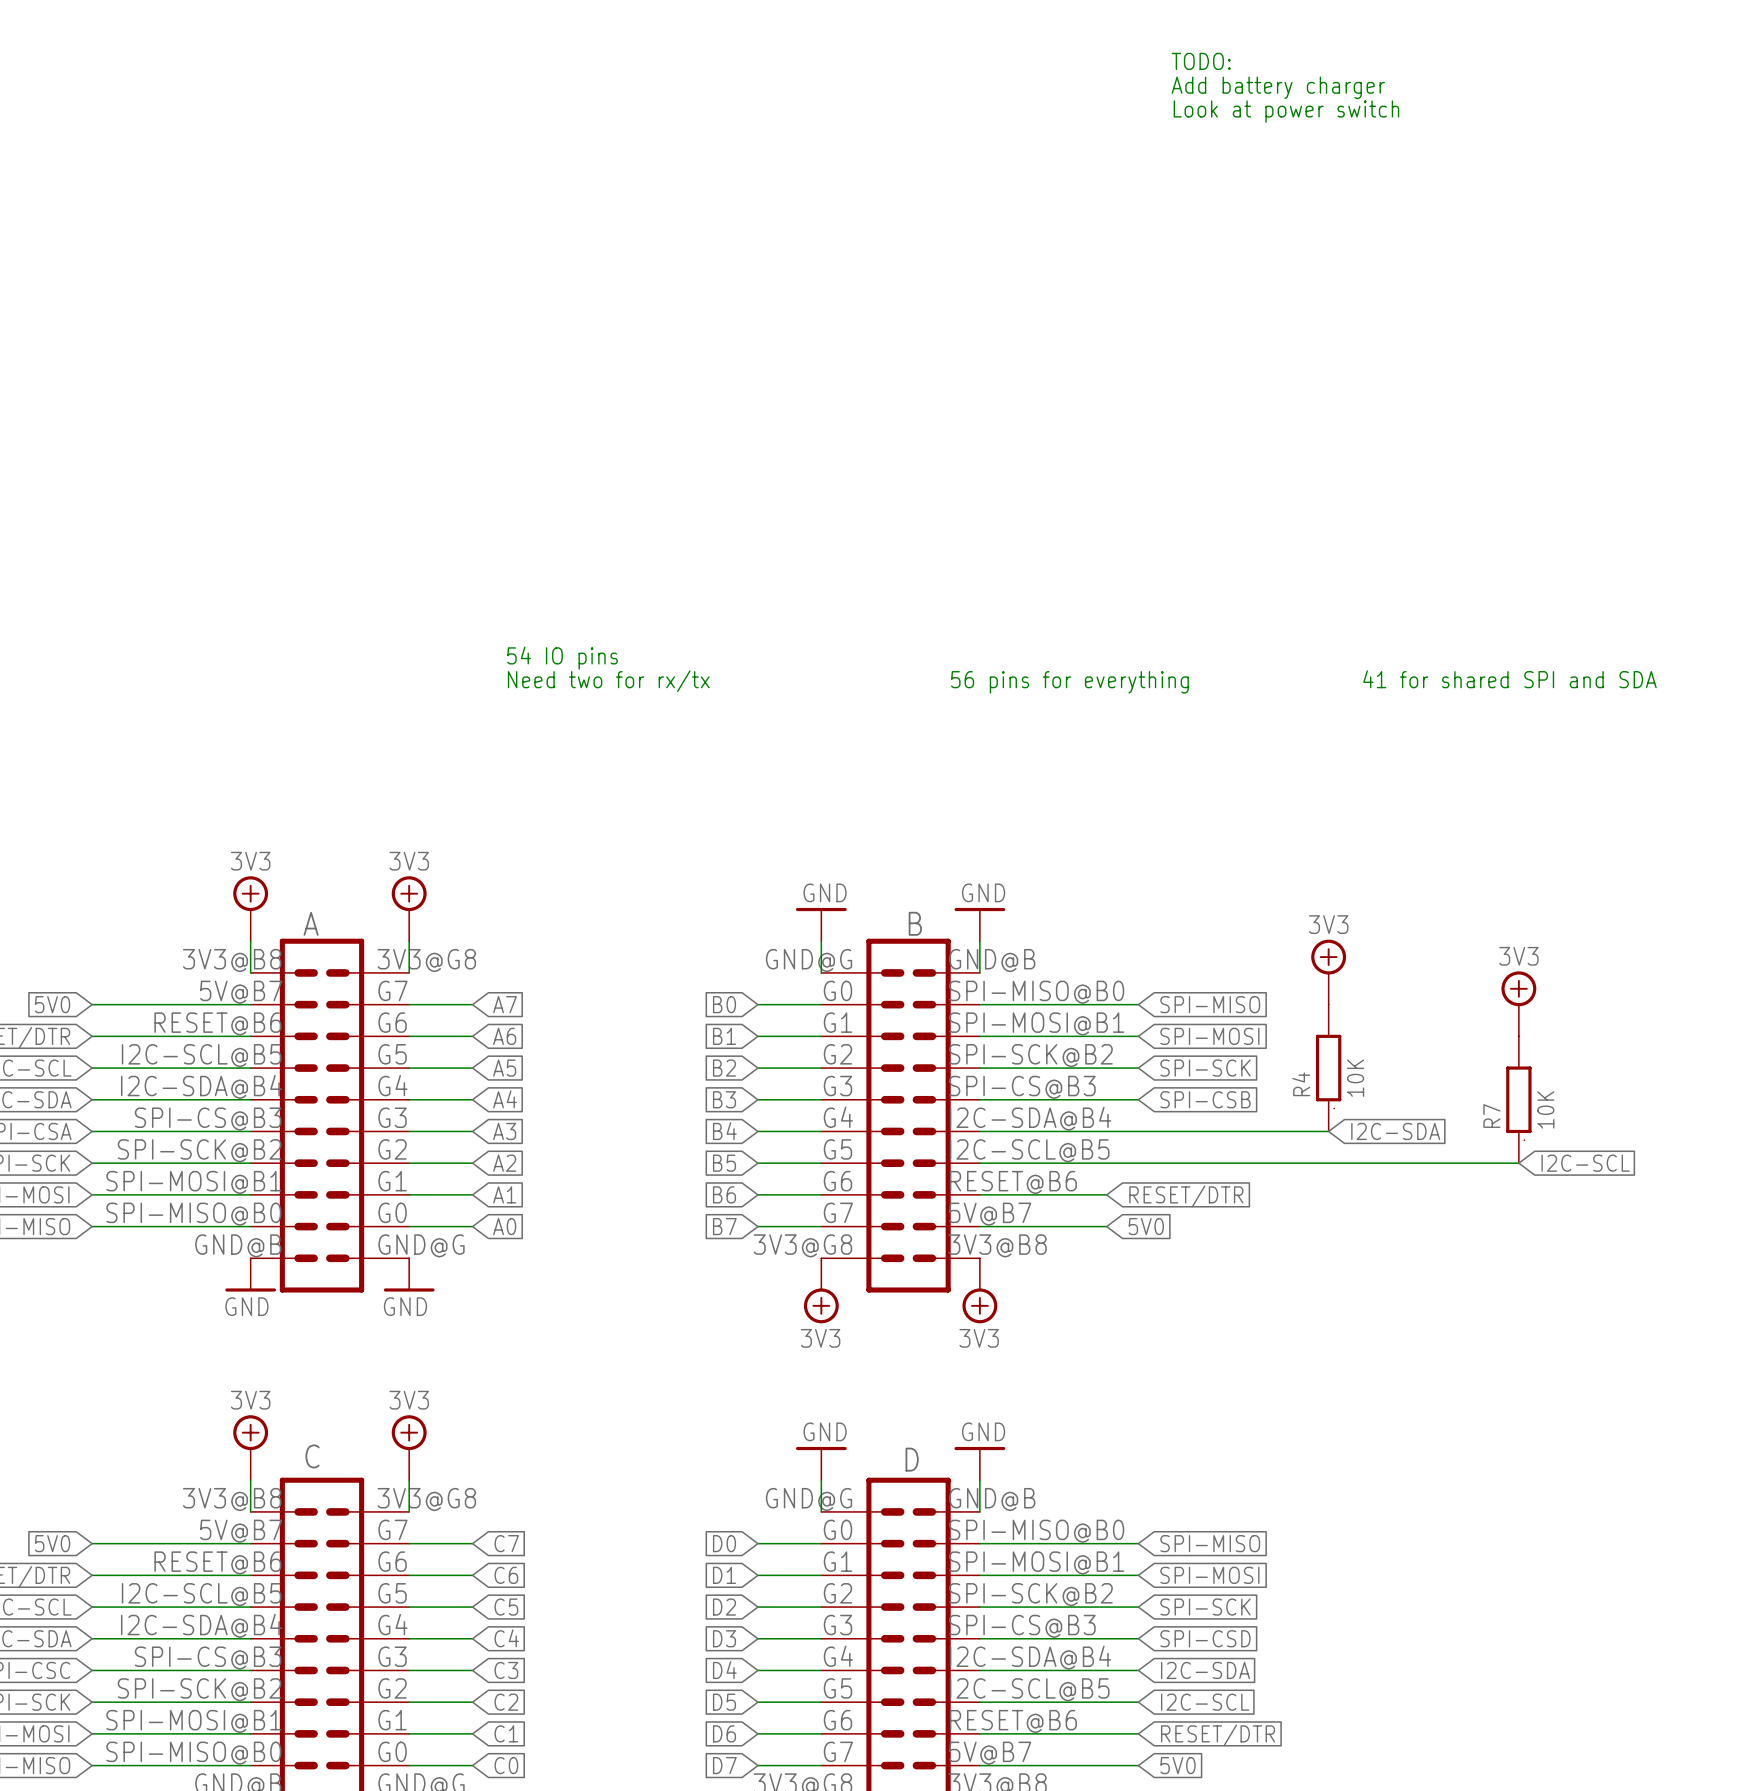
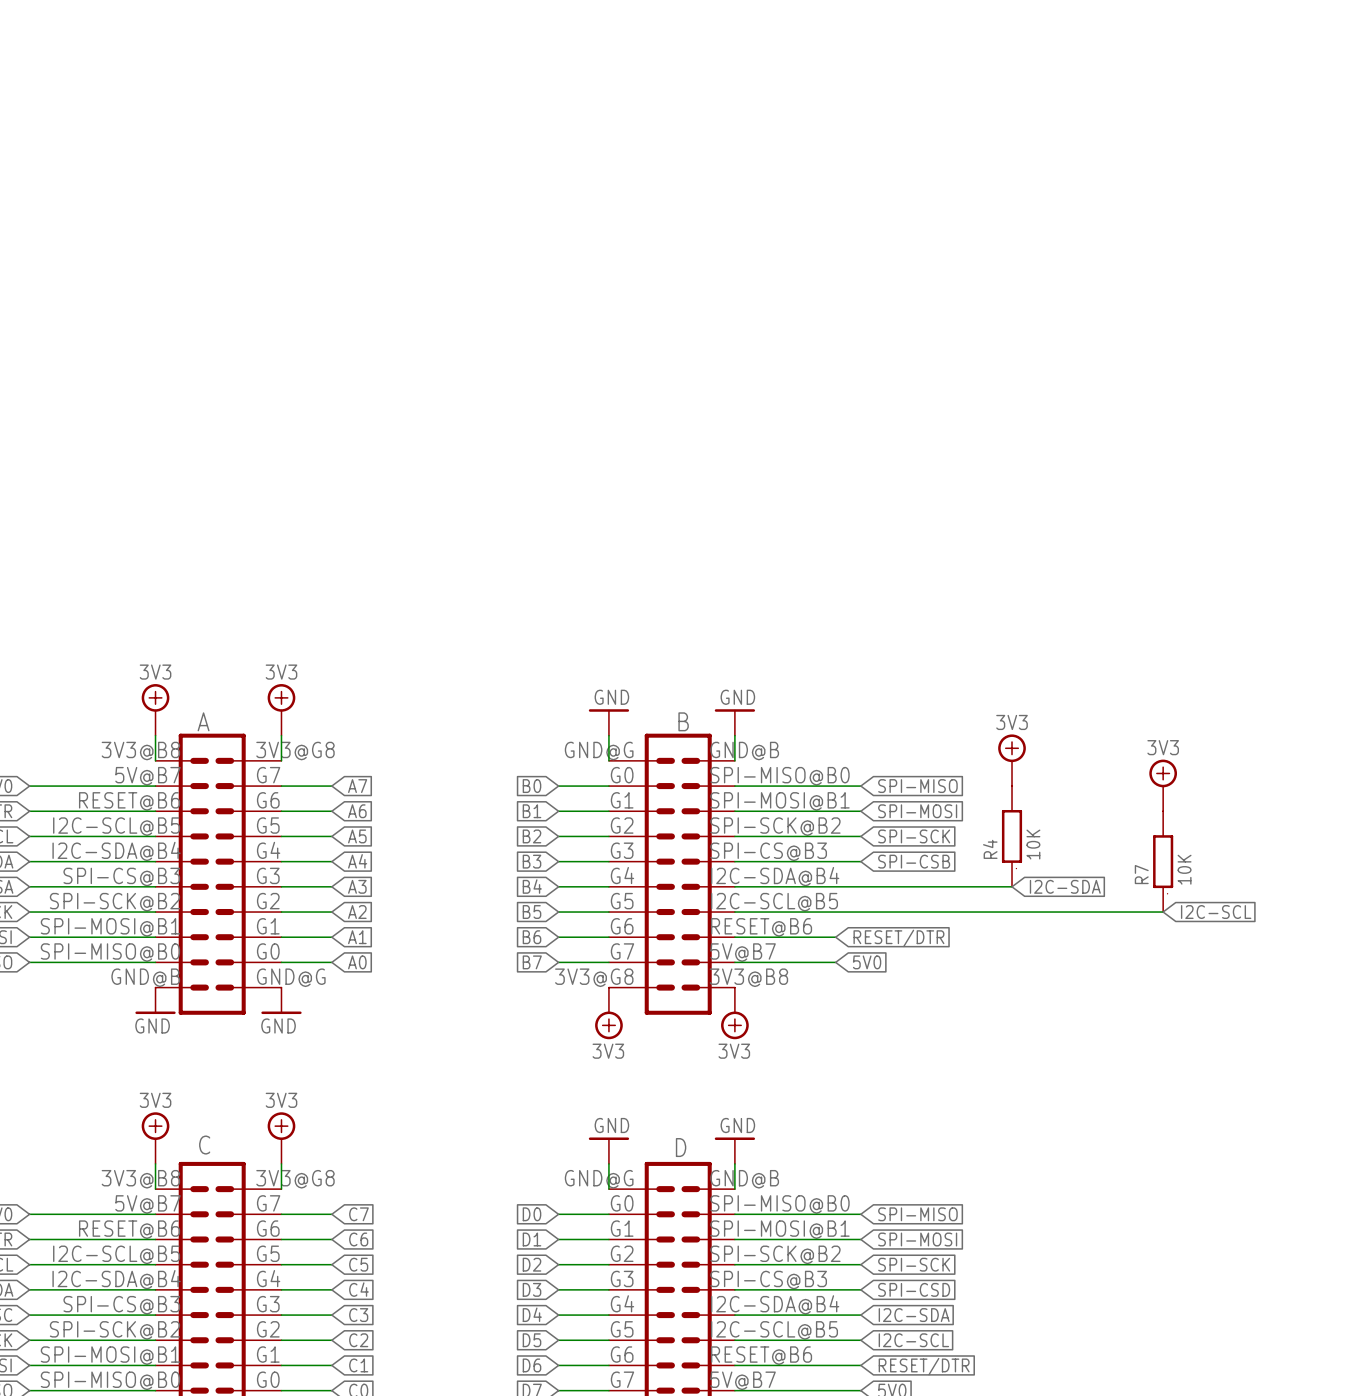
text: TODO: (1201, 61) -> none
text: Add battery charger (1278, 87) -> none
text: Look at power switch (1286, 111) -> none
text: 54 IO pins (562, 658) -> none
text: 41 for shared SPI and SDA (1509, 679) -> none
text: Need two for rx/tx (608, 681) -> none
text: 56 pins for everything (1069, 682) -> none

